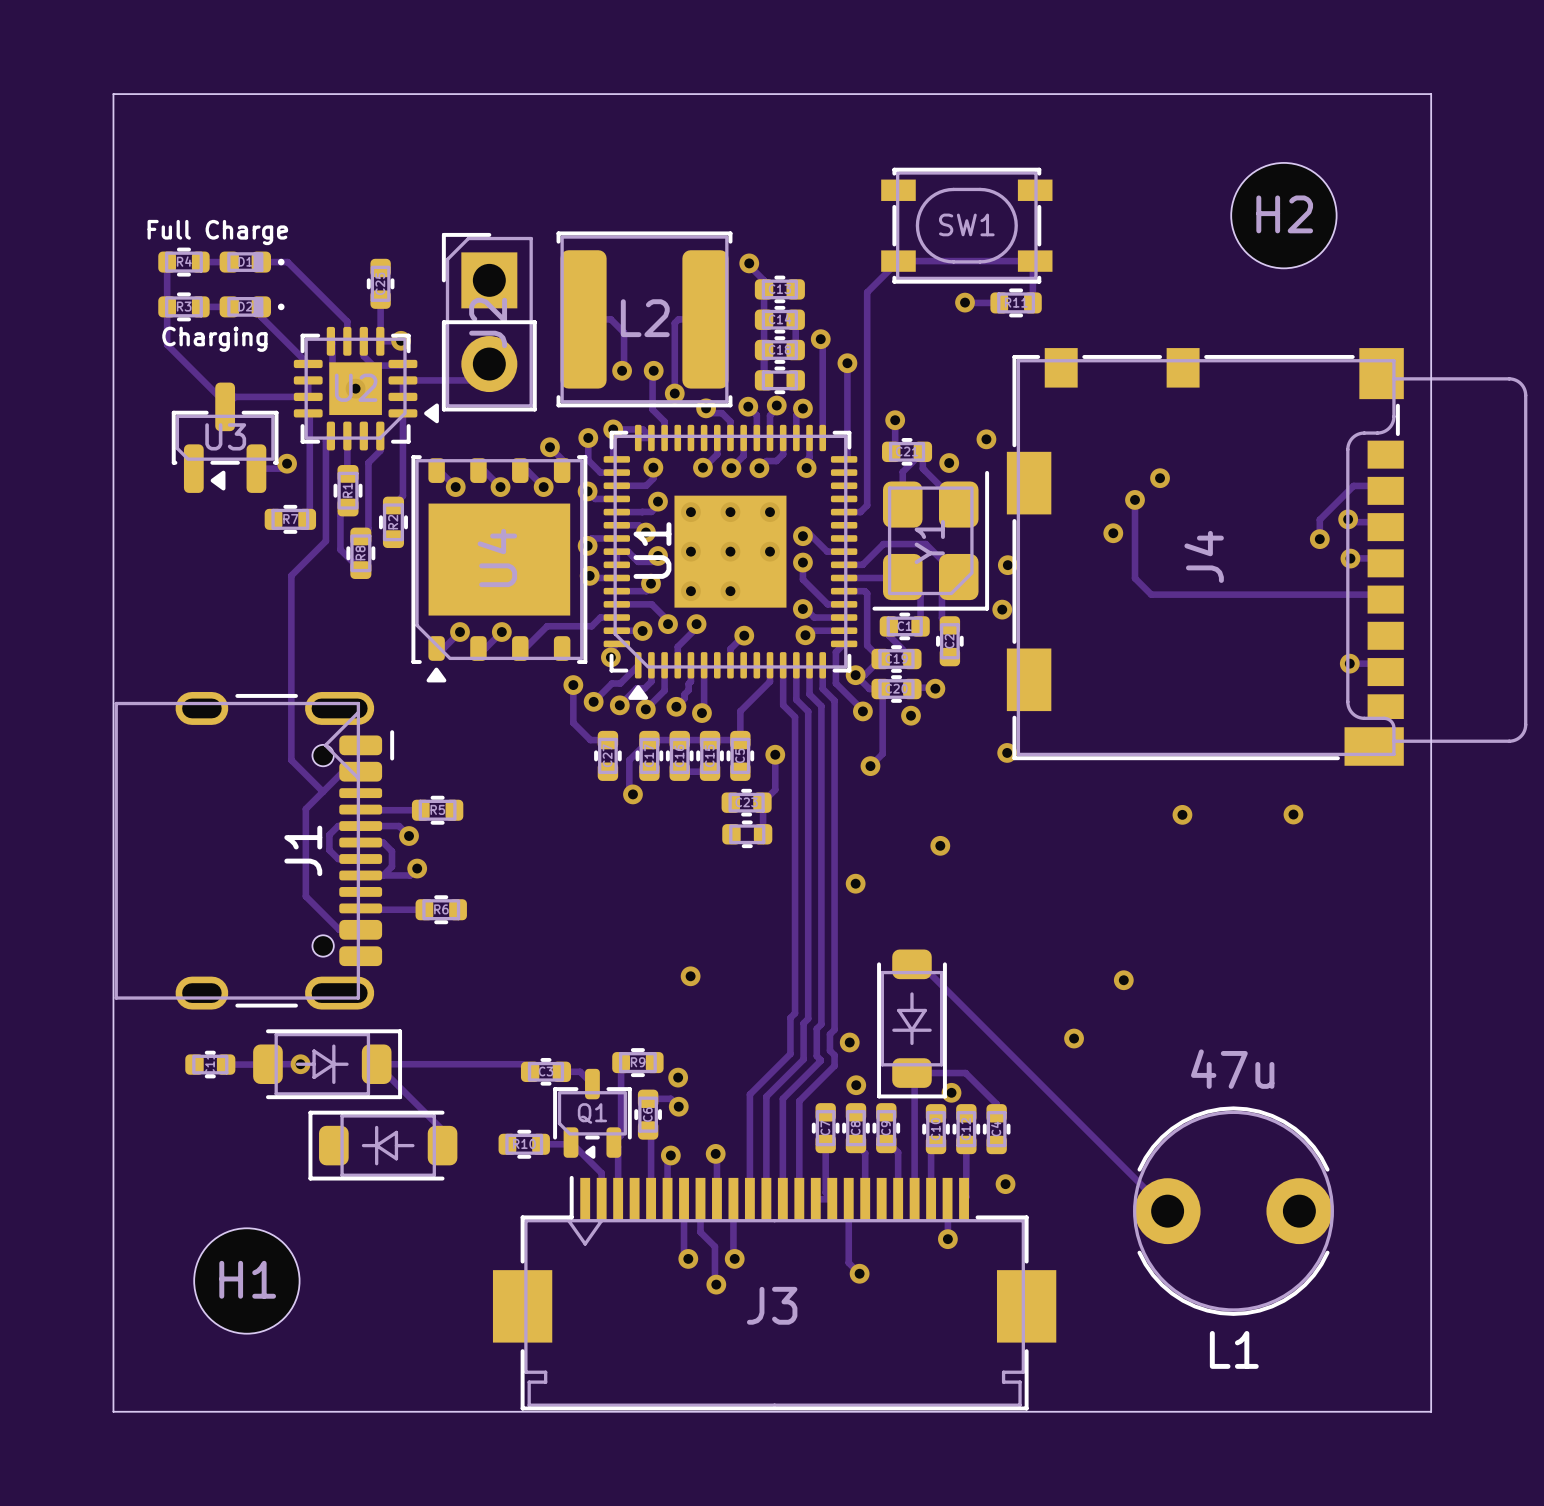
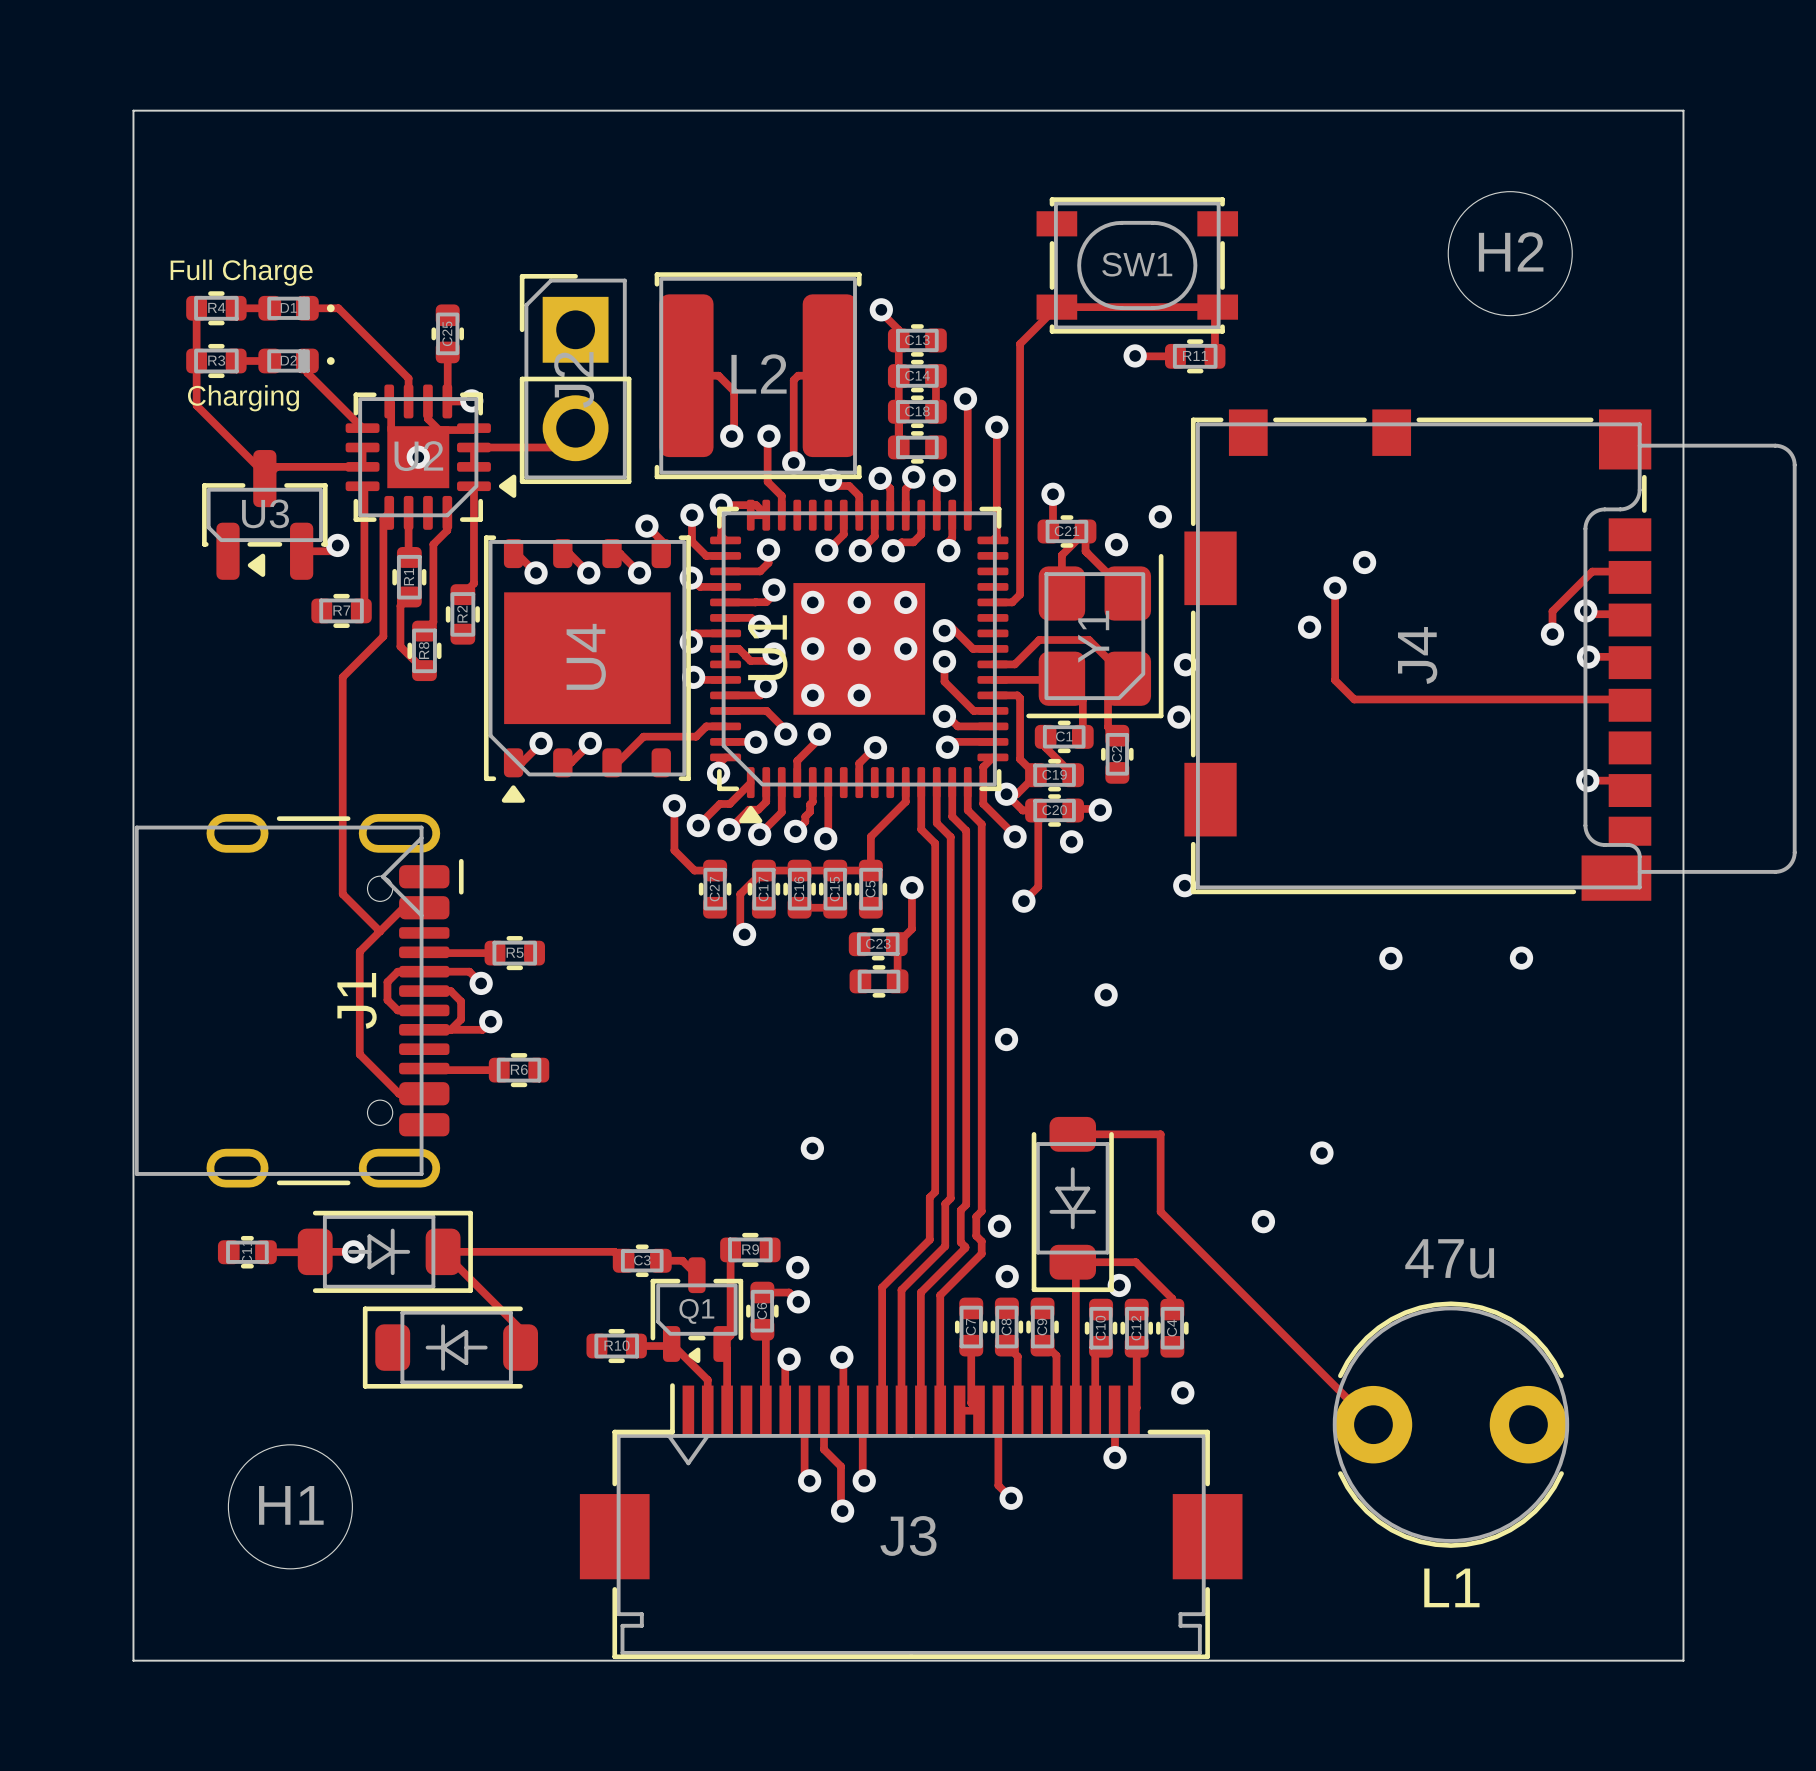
track: (920, 964) (986, 1030) -> (1083, 1134) (1160, 1134) (1160, 1211)

